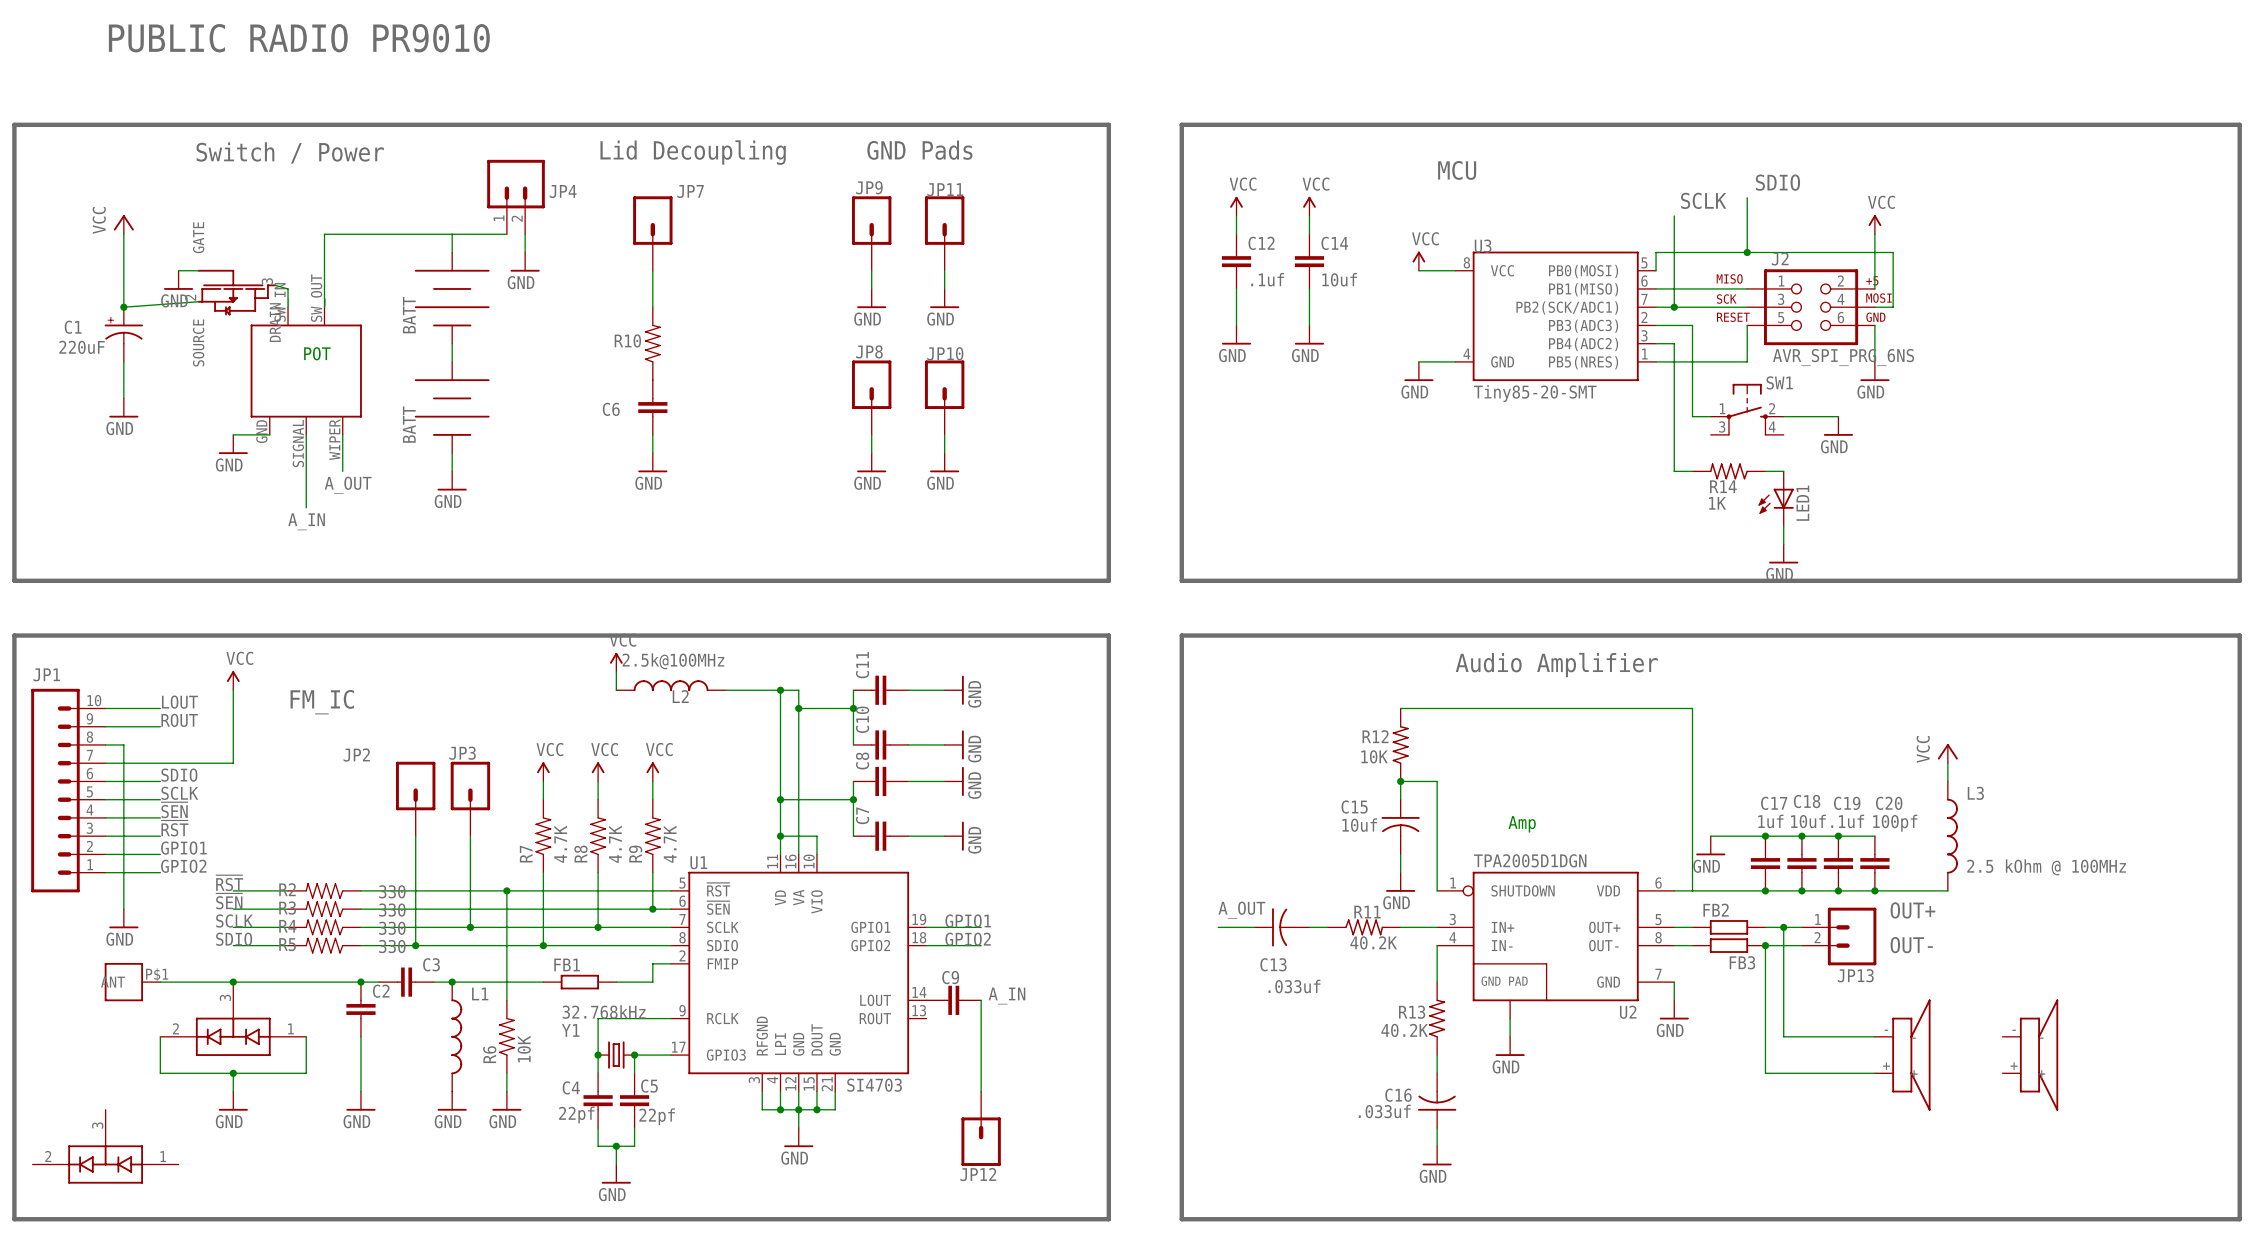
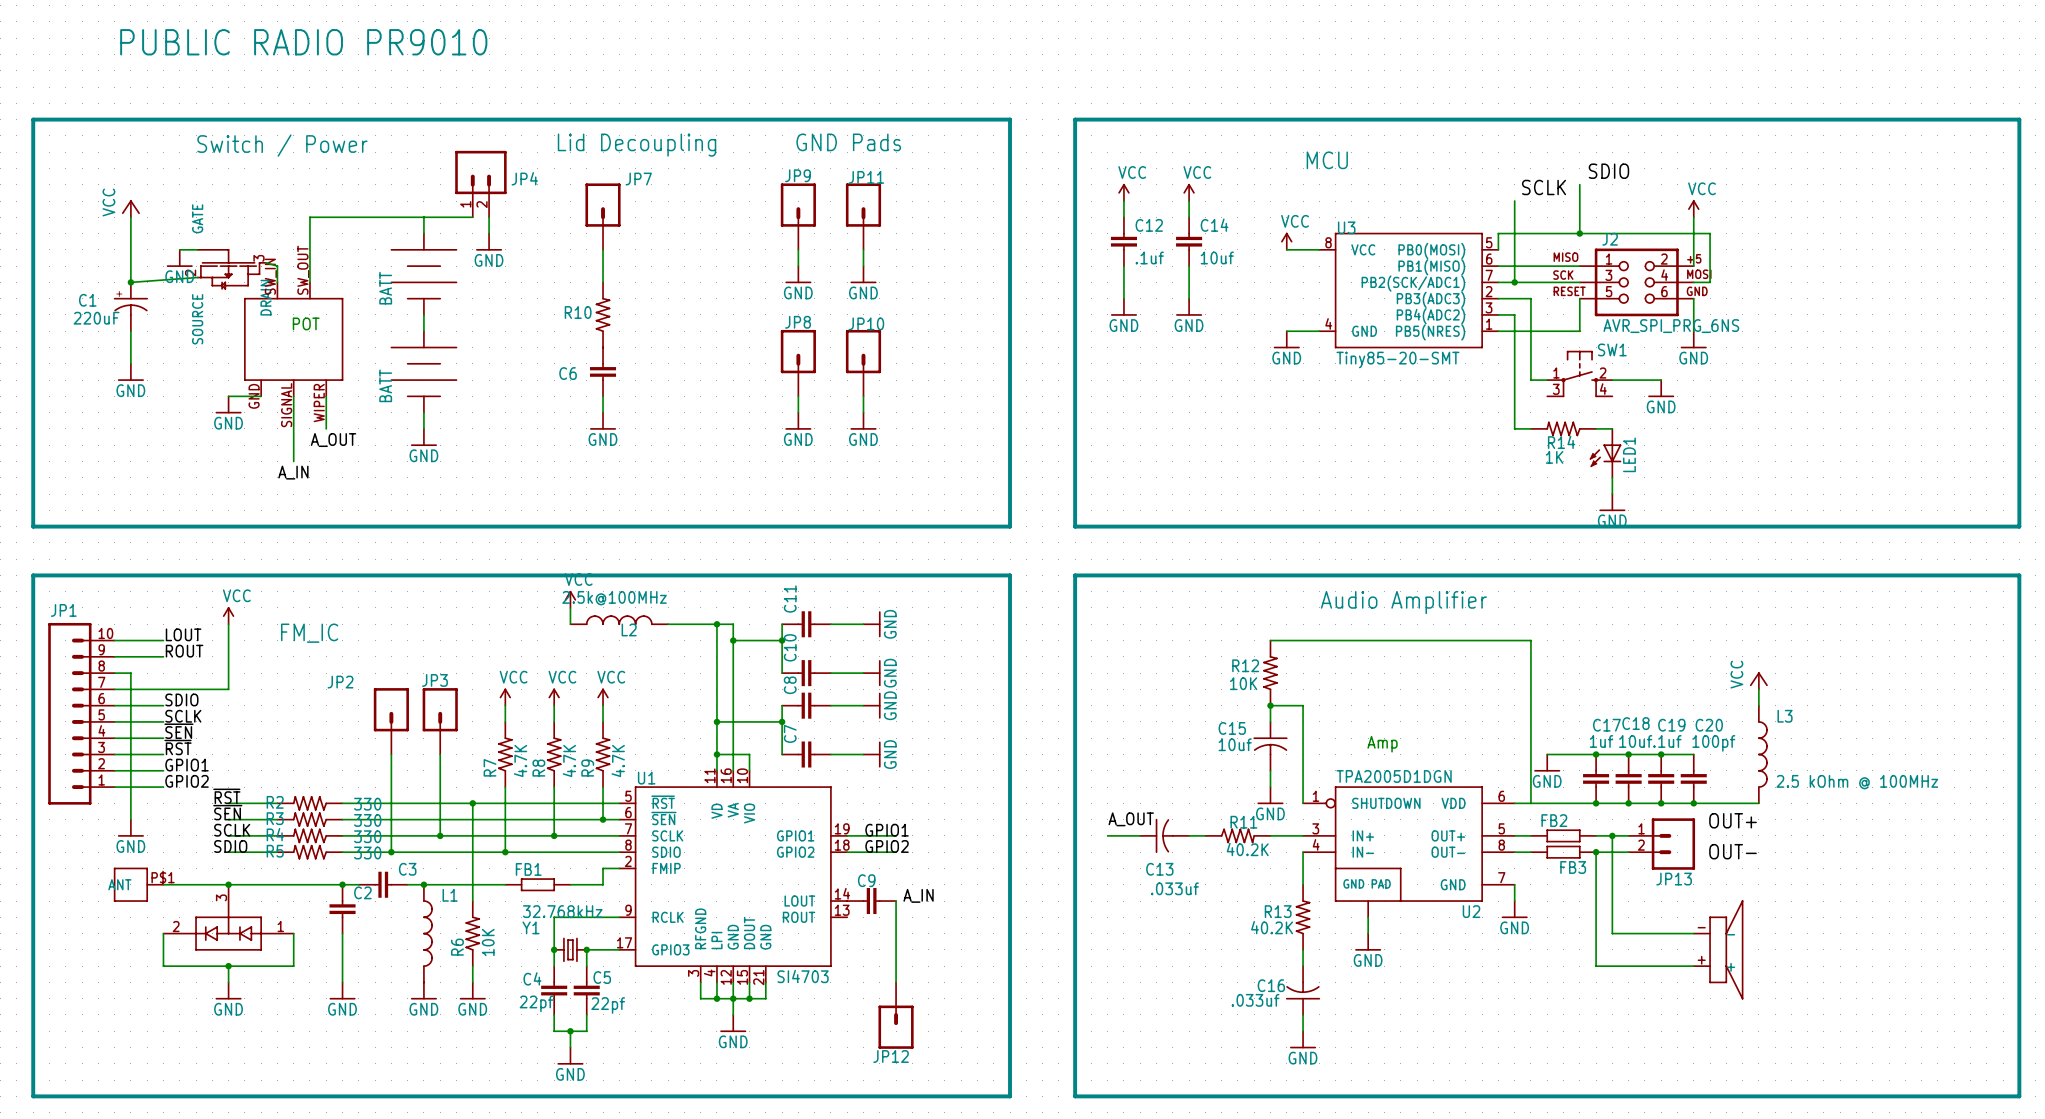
part: (2030, 1055) -> none
part: (105, 1146) -> none

